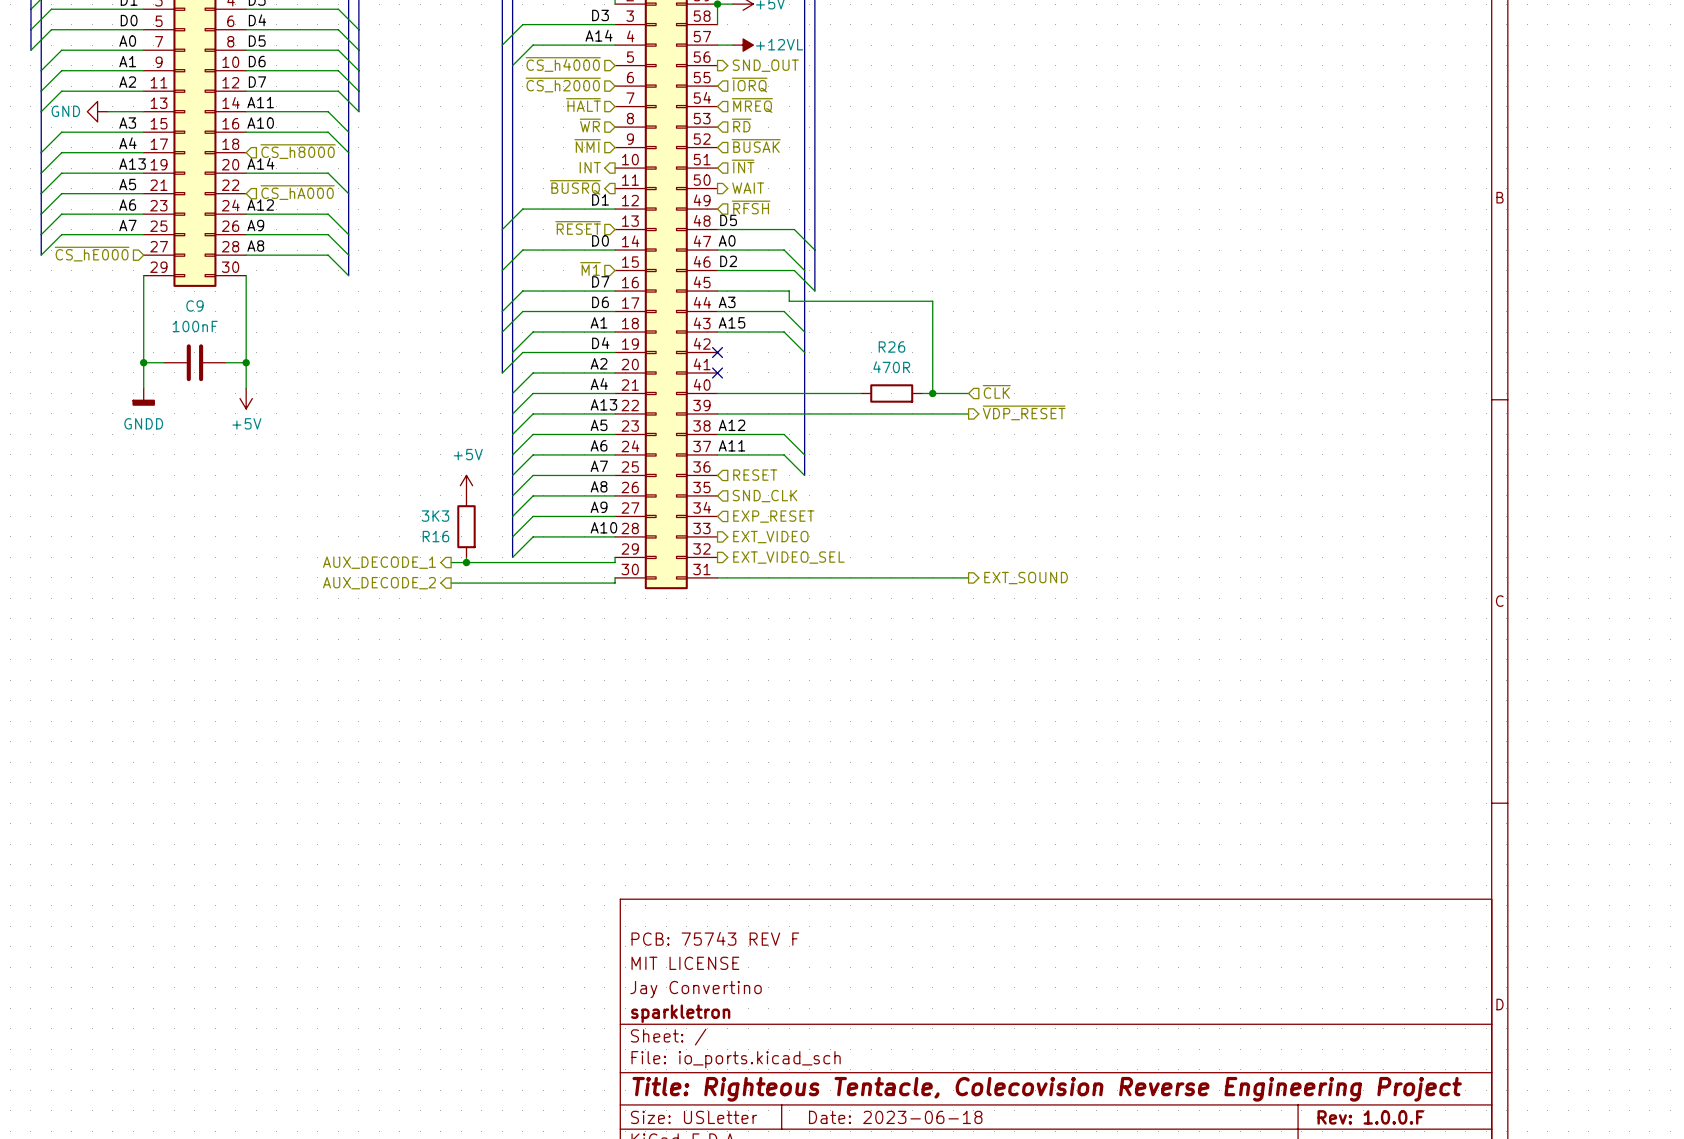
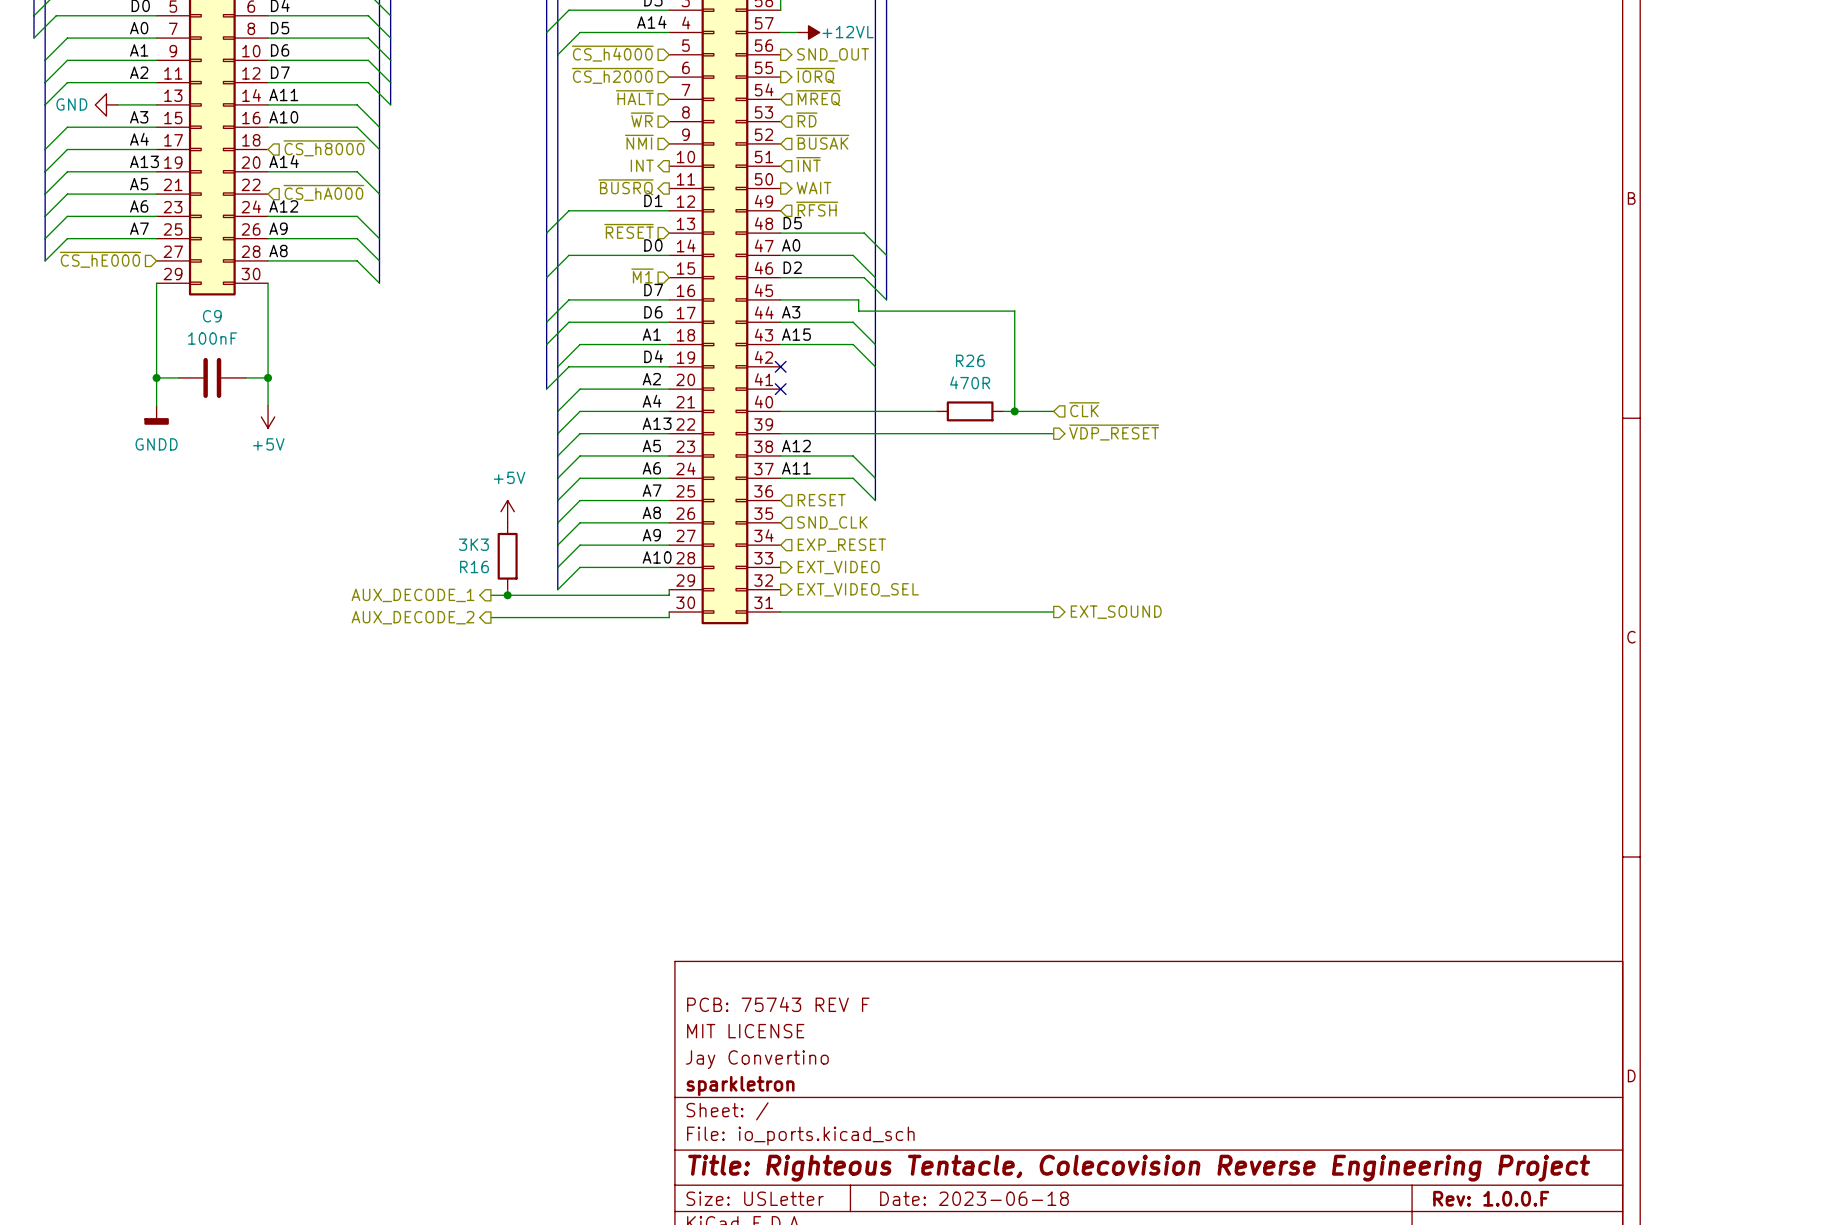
hierarchical label shape: input (749, 85) -> output (815, 75)

